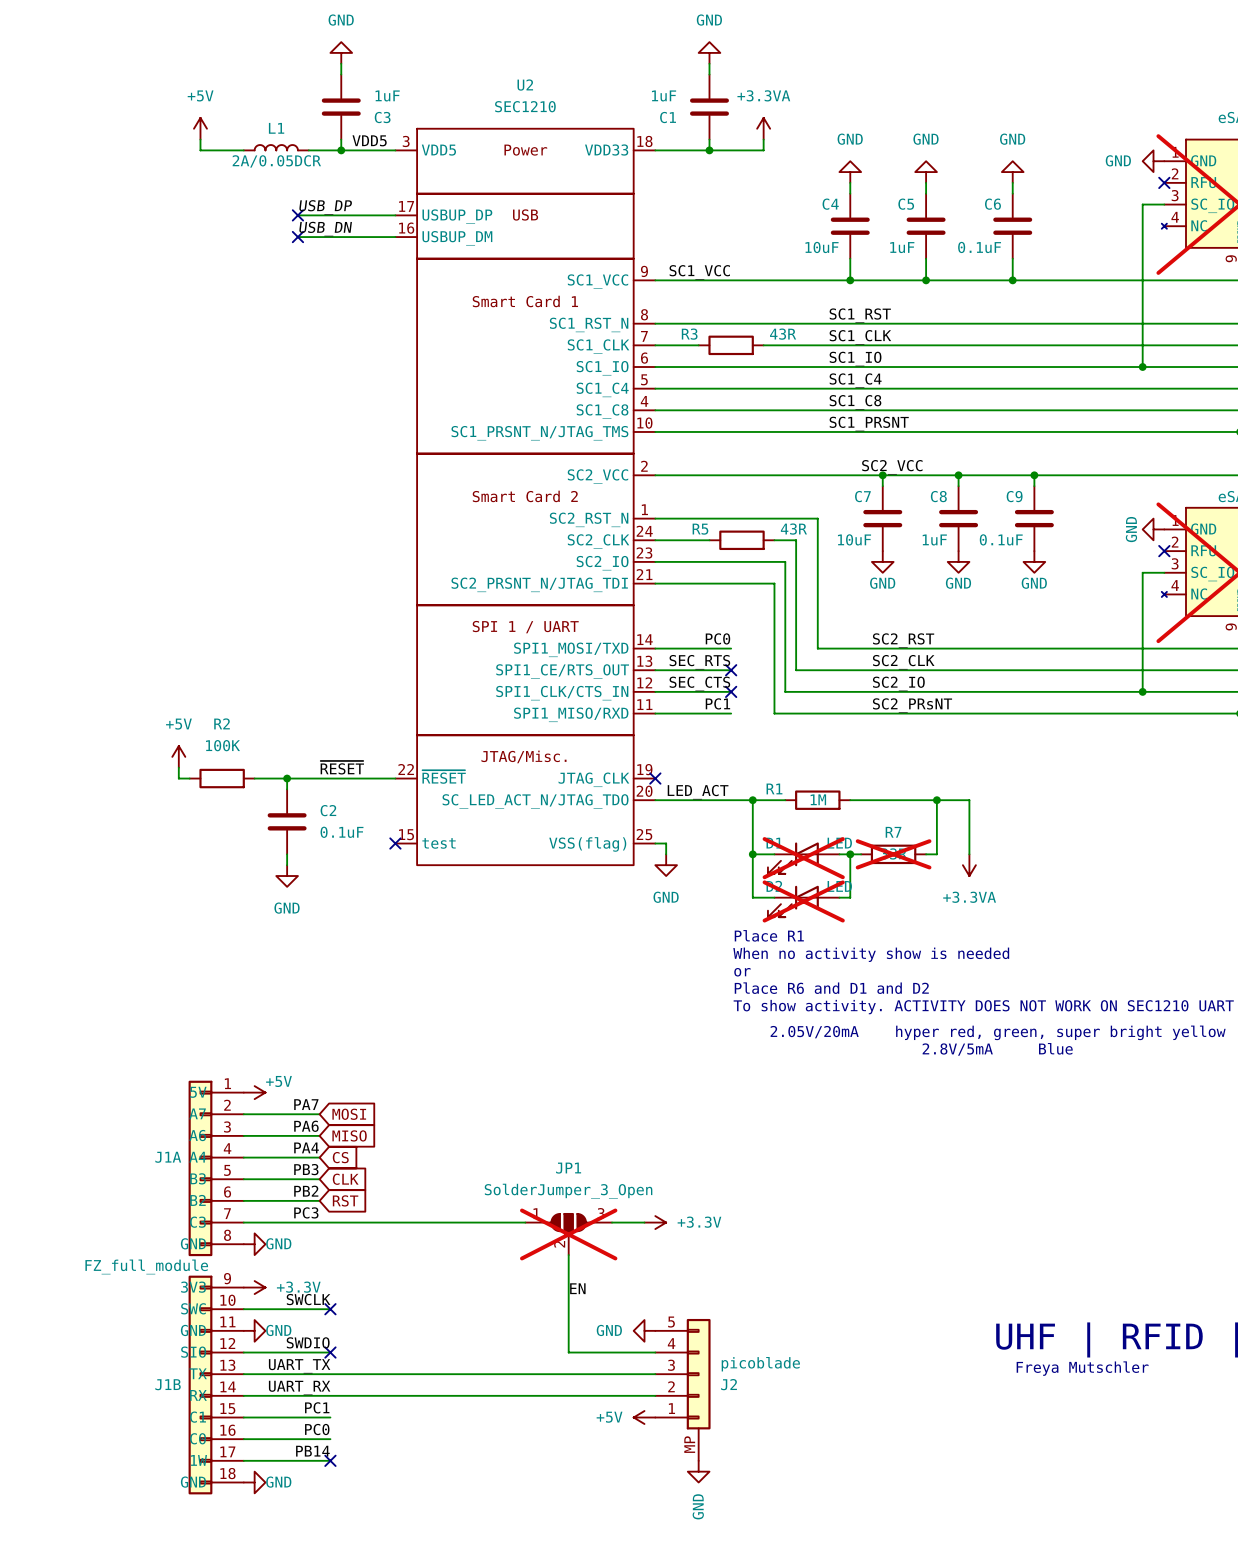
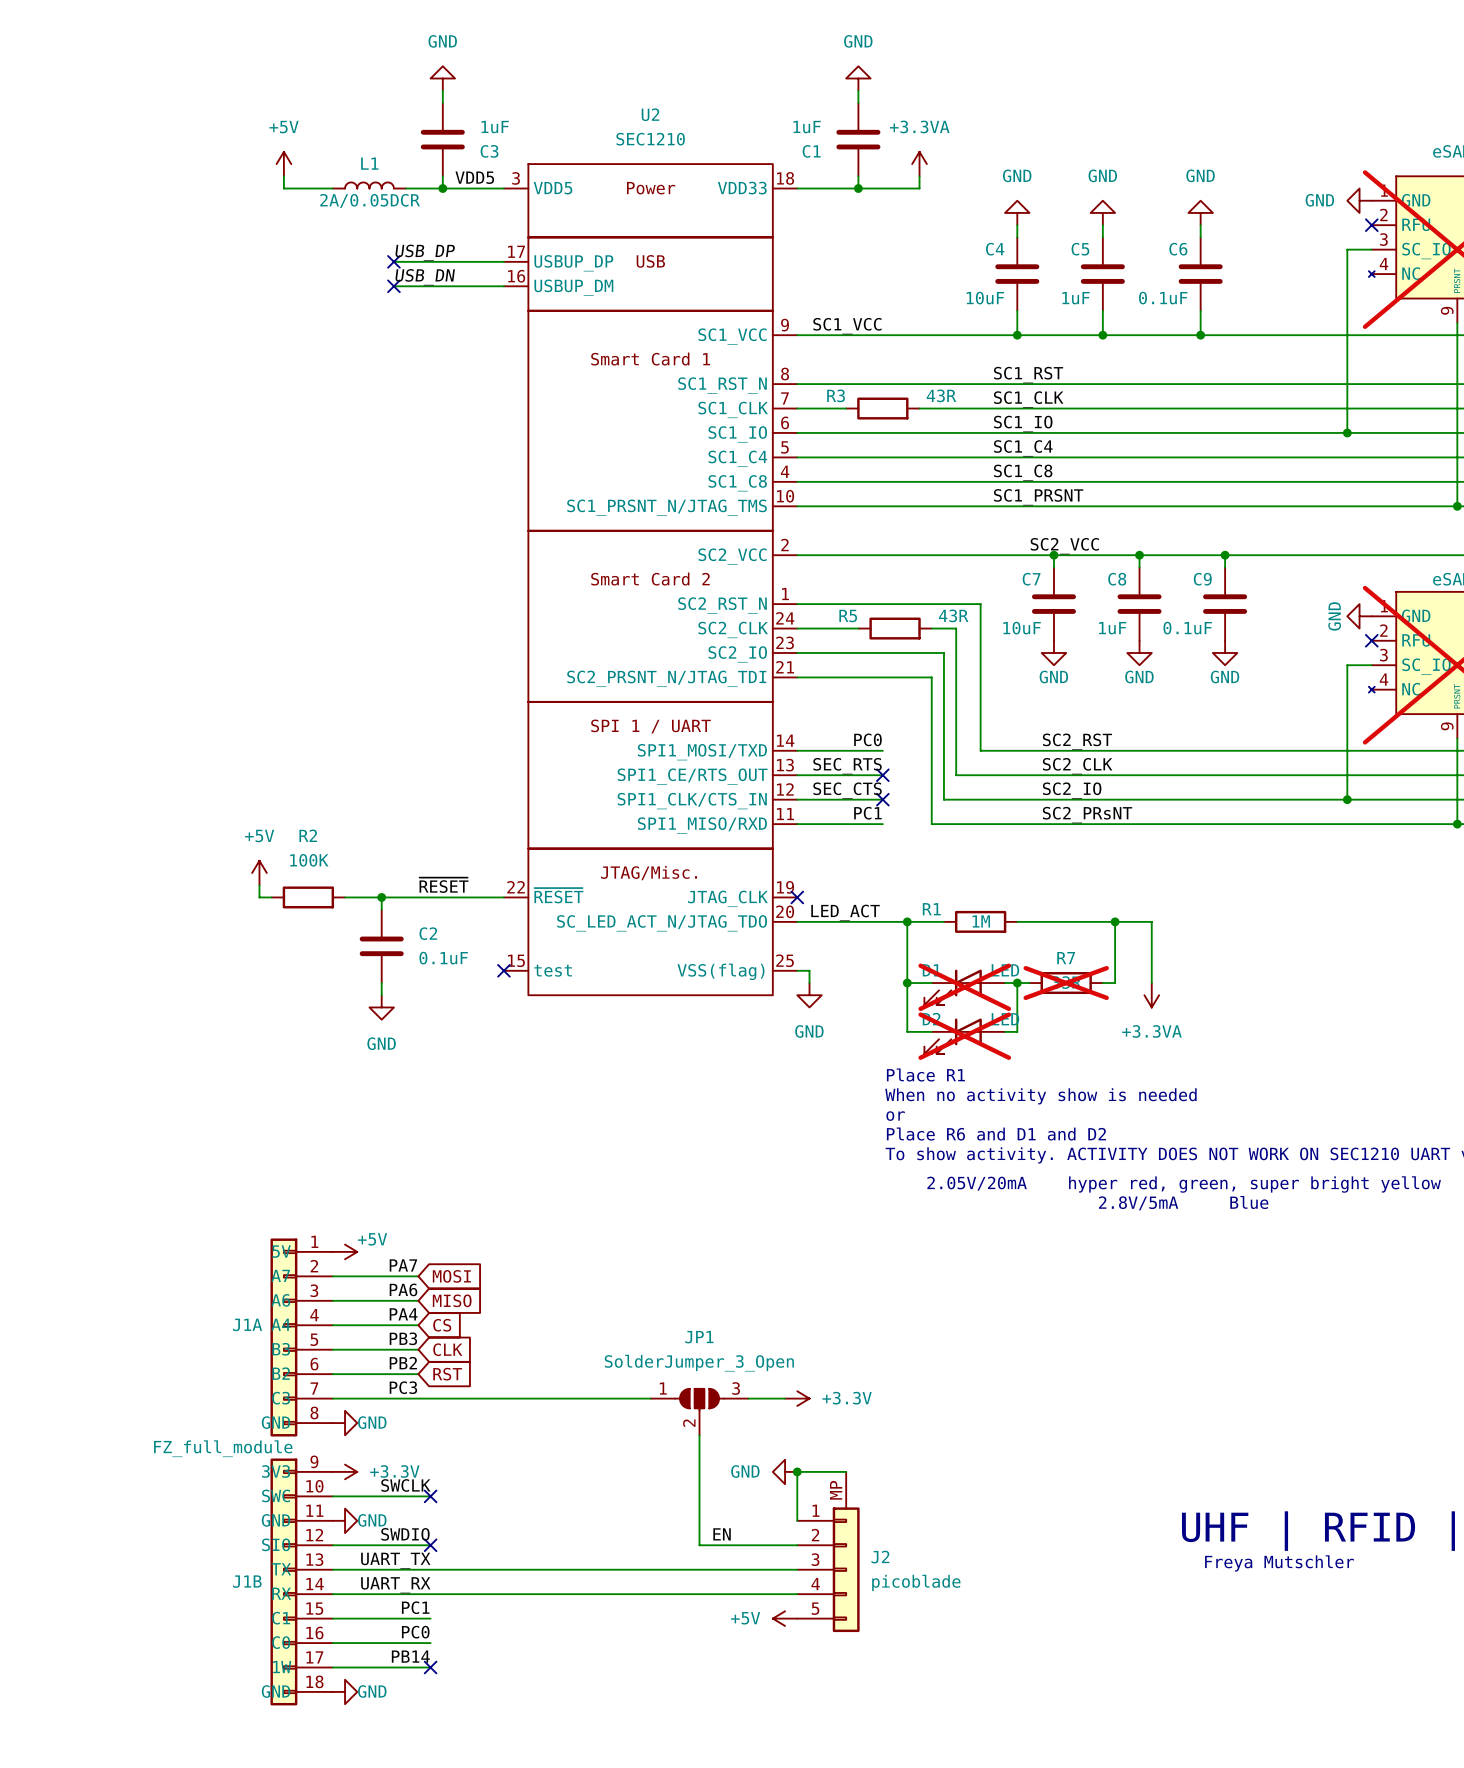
JP1 do-not-place cross: (568, 1234) -> none
junction: none -> (797, 1471)
wire: none -> (846, 1471) (797, 1471) (797, 1520)
label position: EN (577, 1288) -> EN (722, 1534)
power symbol position: GND (644, 1330) -> GND (785, 1471)
J2 flip: as is (698, 1374) -> up-down (846, 1569)
power symbol: GND (698, 1471) -> none

